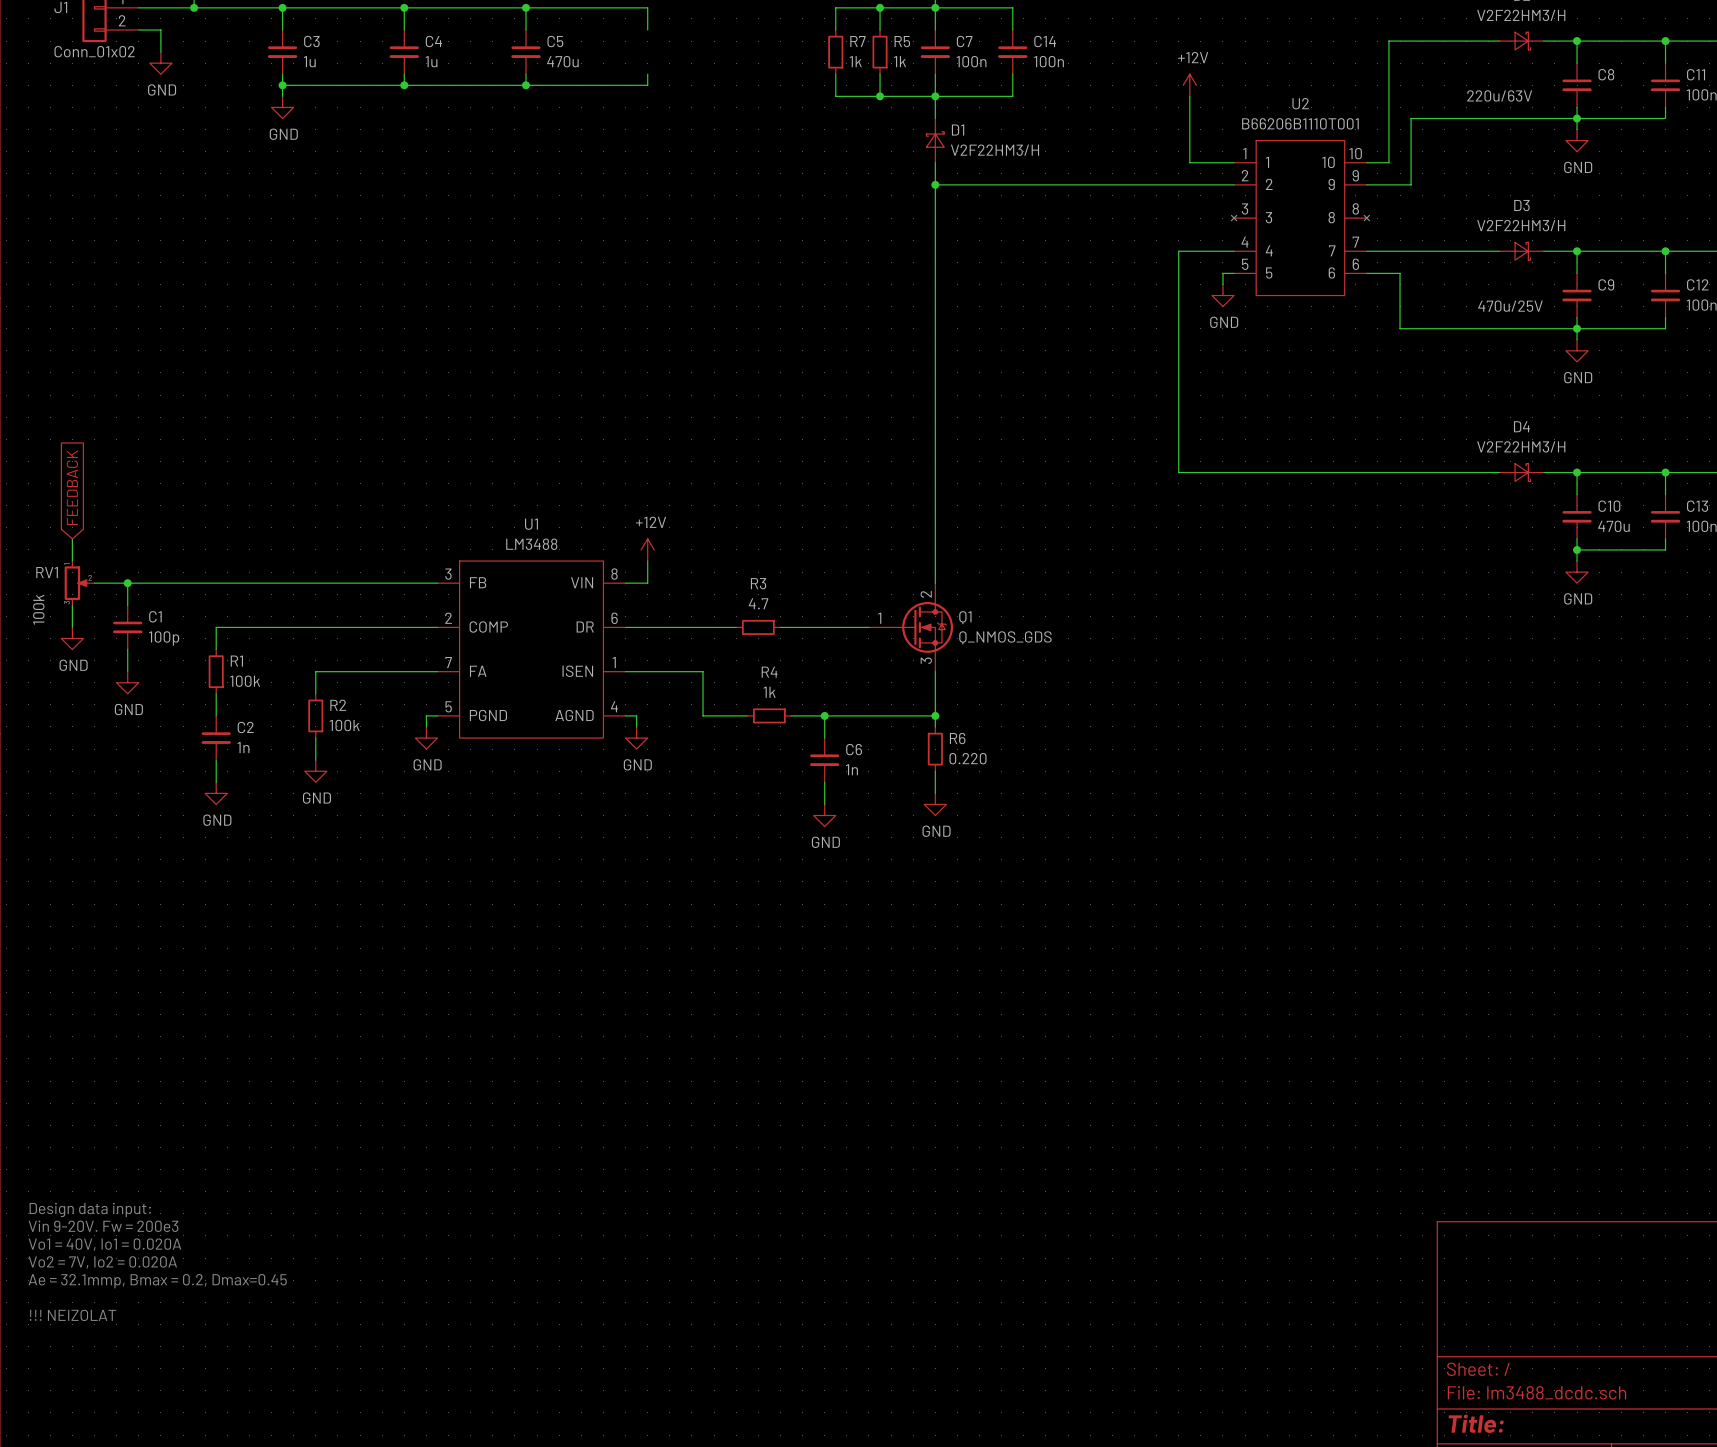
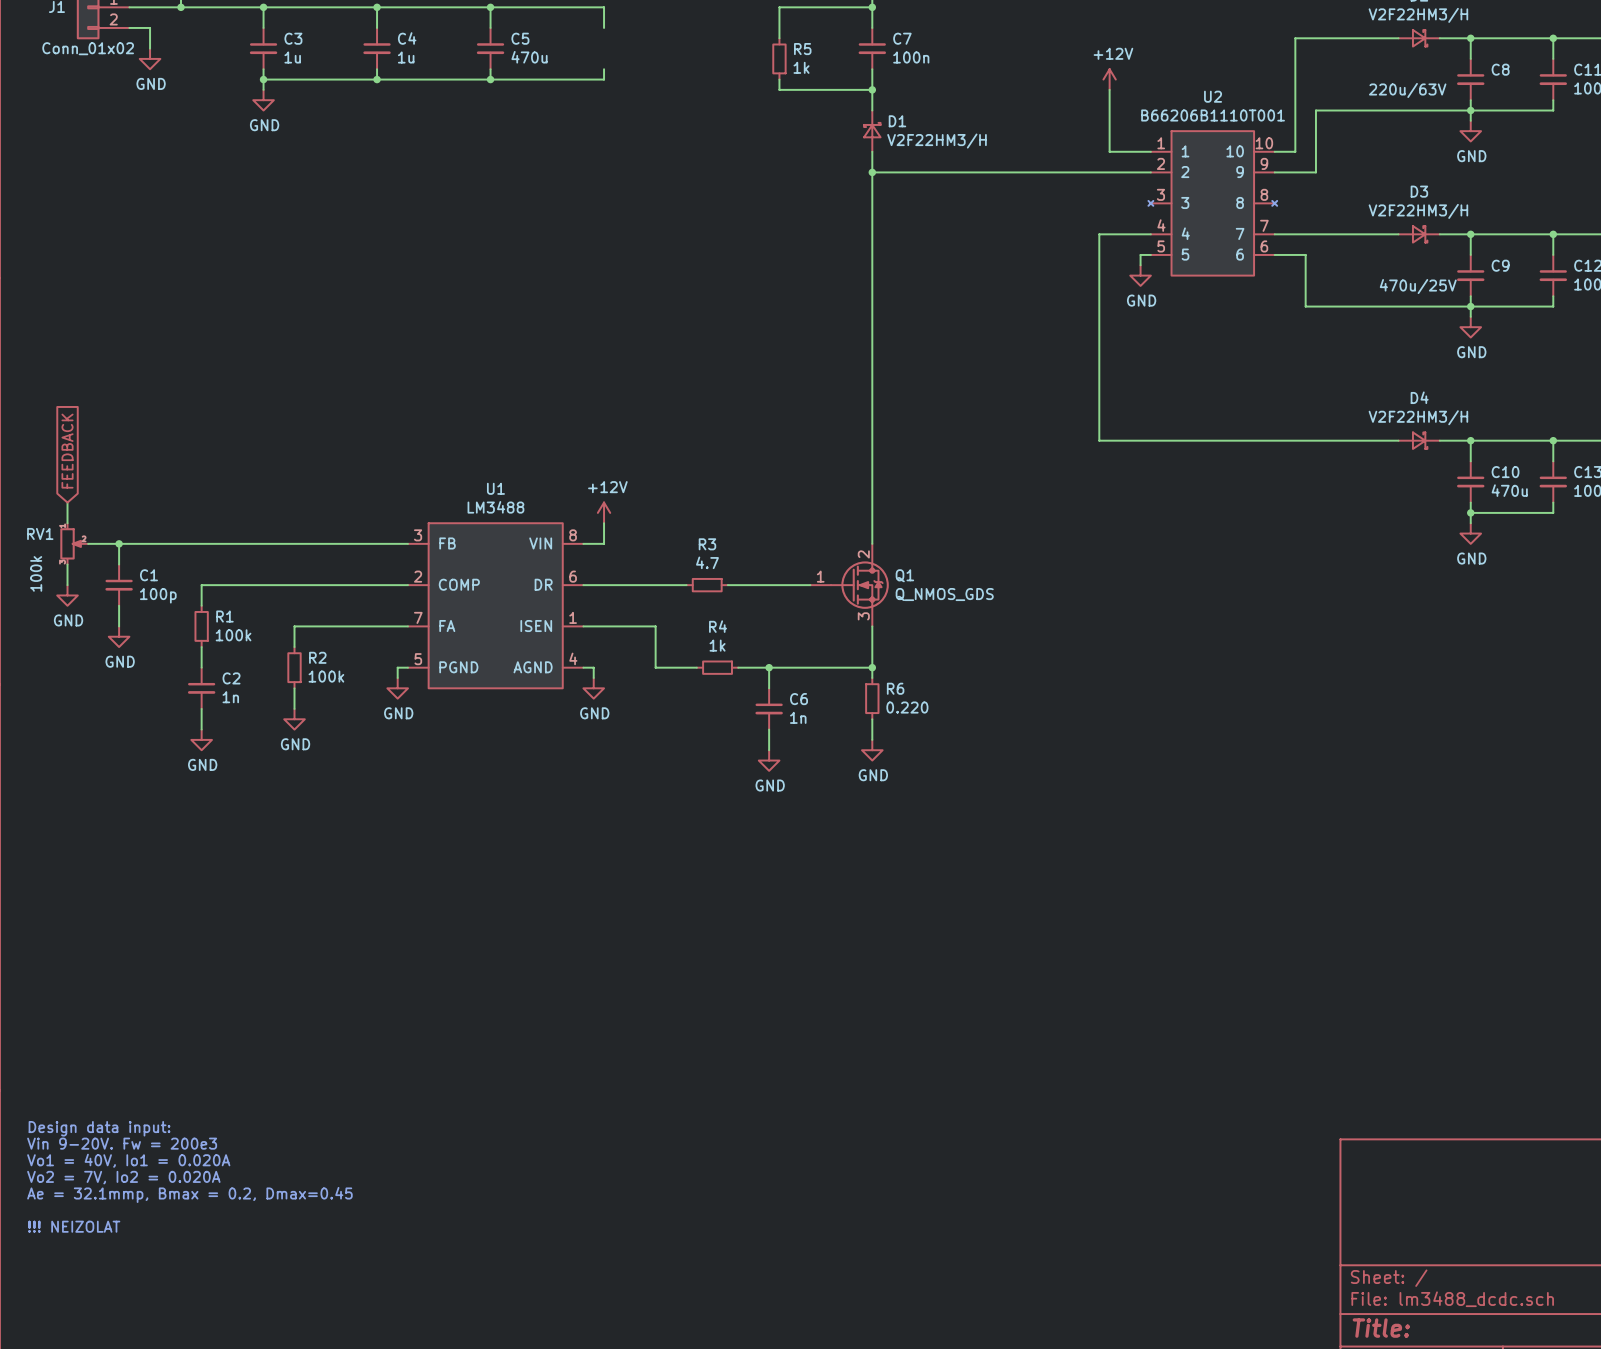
wire: (880, 7) (880, 29) -> none
junction: (880, 7) -> none
wire: (935, 7) (1012, 7) (1012, 29) -> none
R7: 1k (835, 52) -> none
R5 position: (880, 52) -> (779, 58)
C14: 100n (1012, 52) -> none
wire: (880, 74) (880, 96) -> none
wire: (1012, 74) (1012, 96) (935, 96) -> none
junction: (880, 96) -> none

